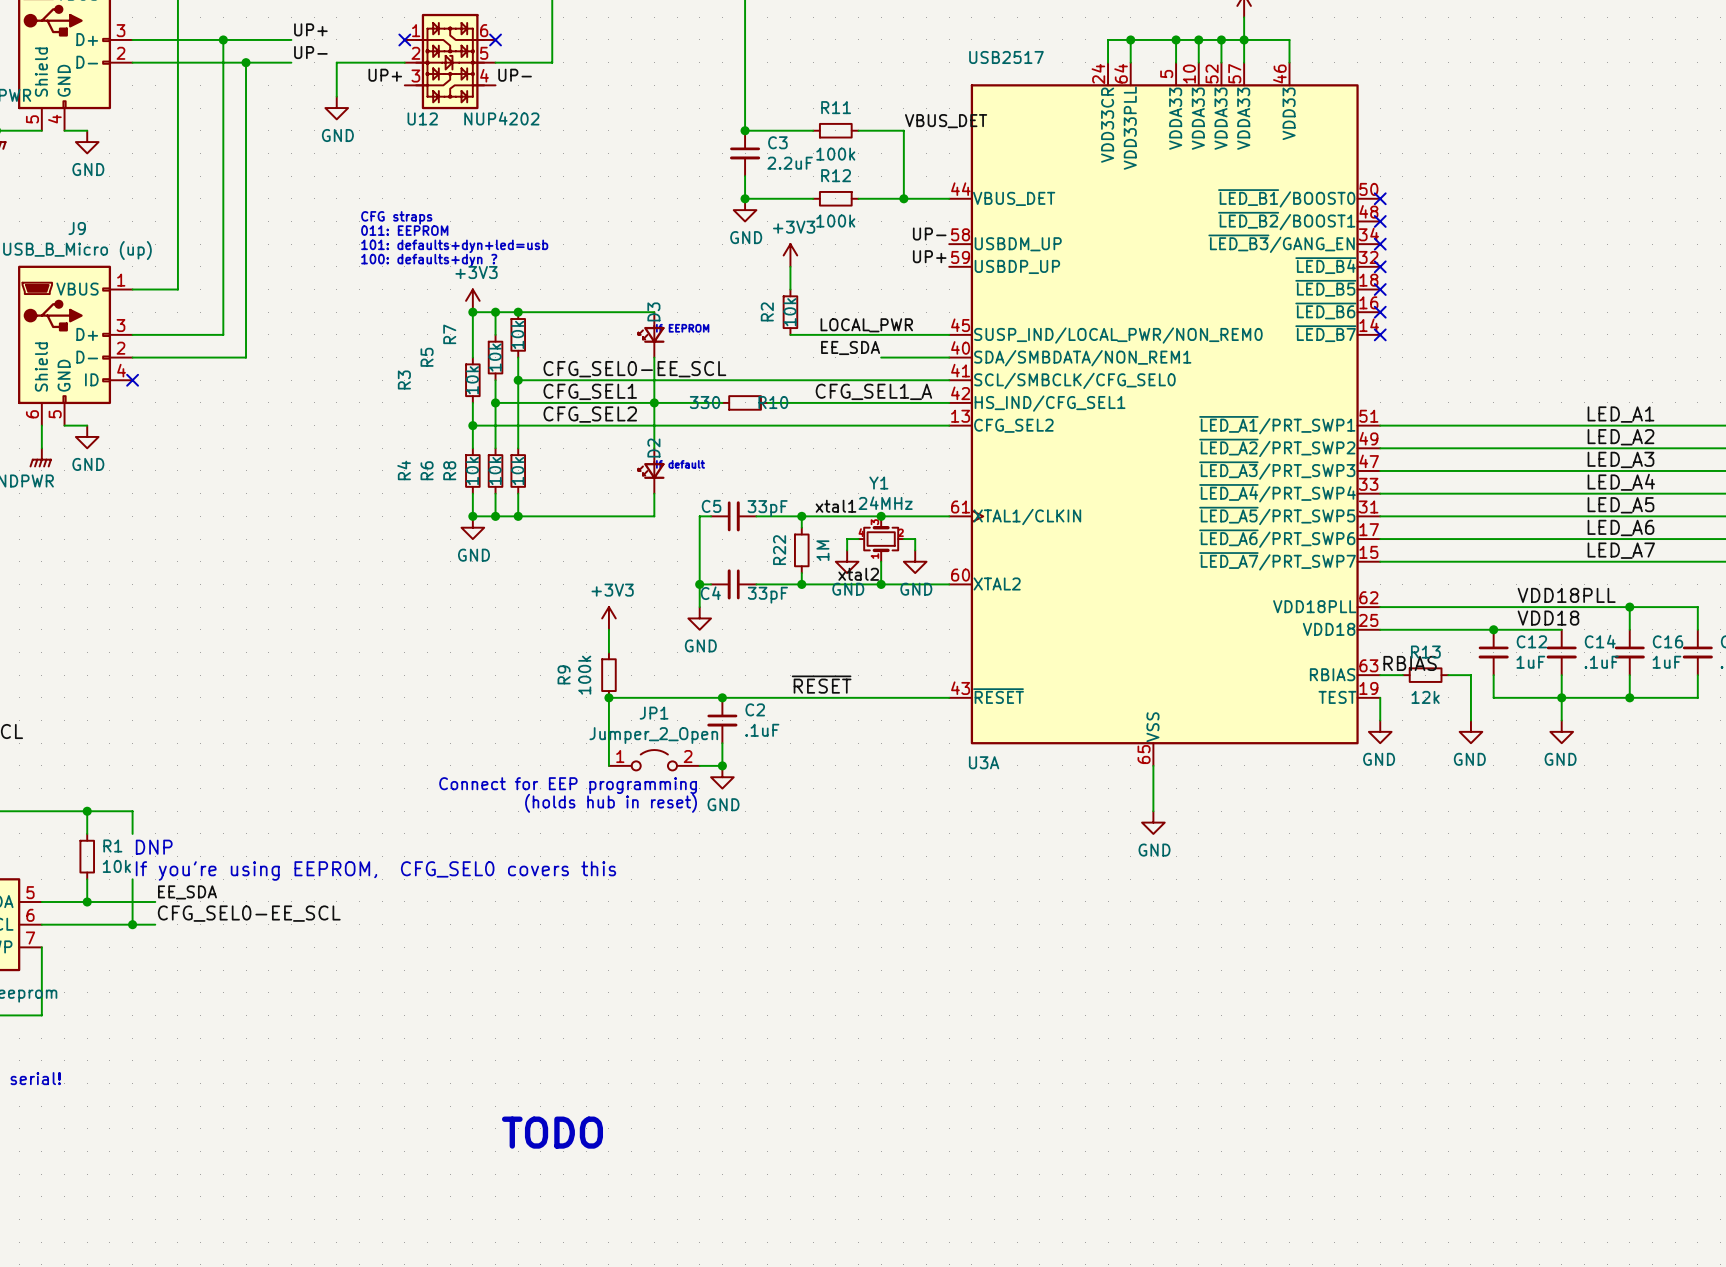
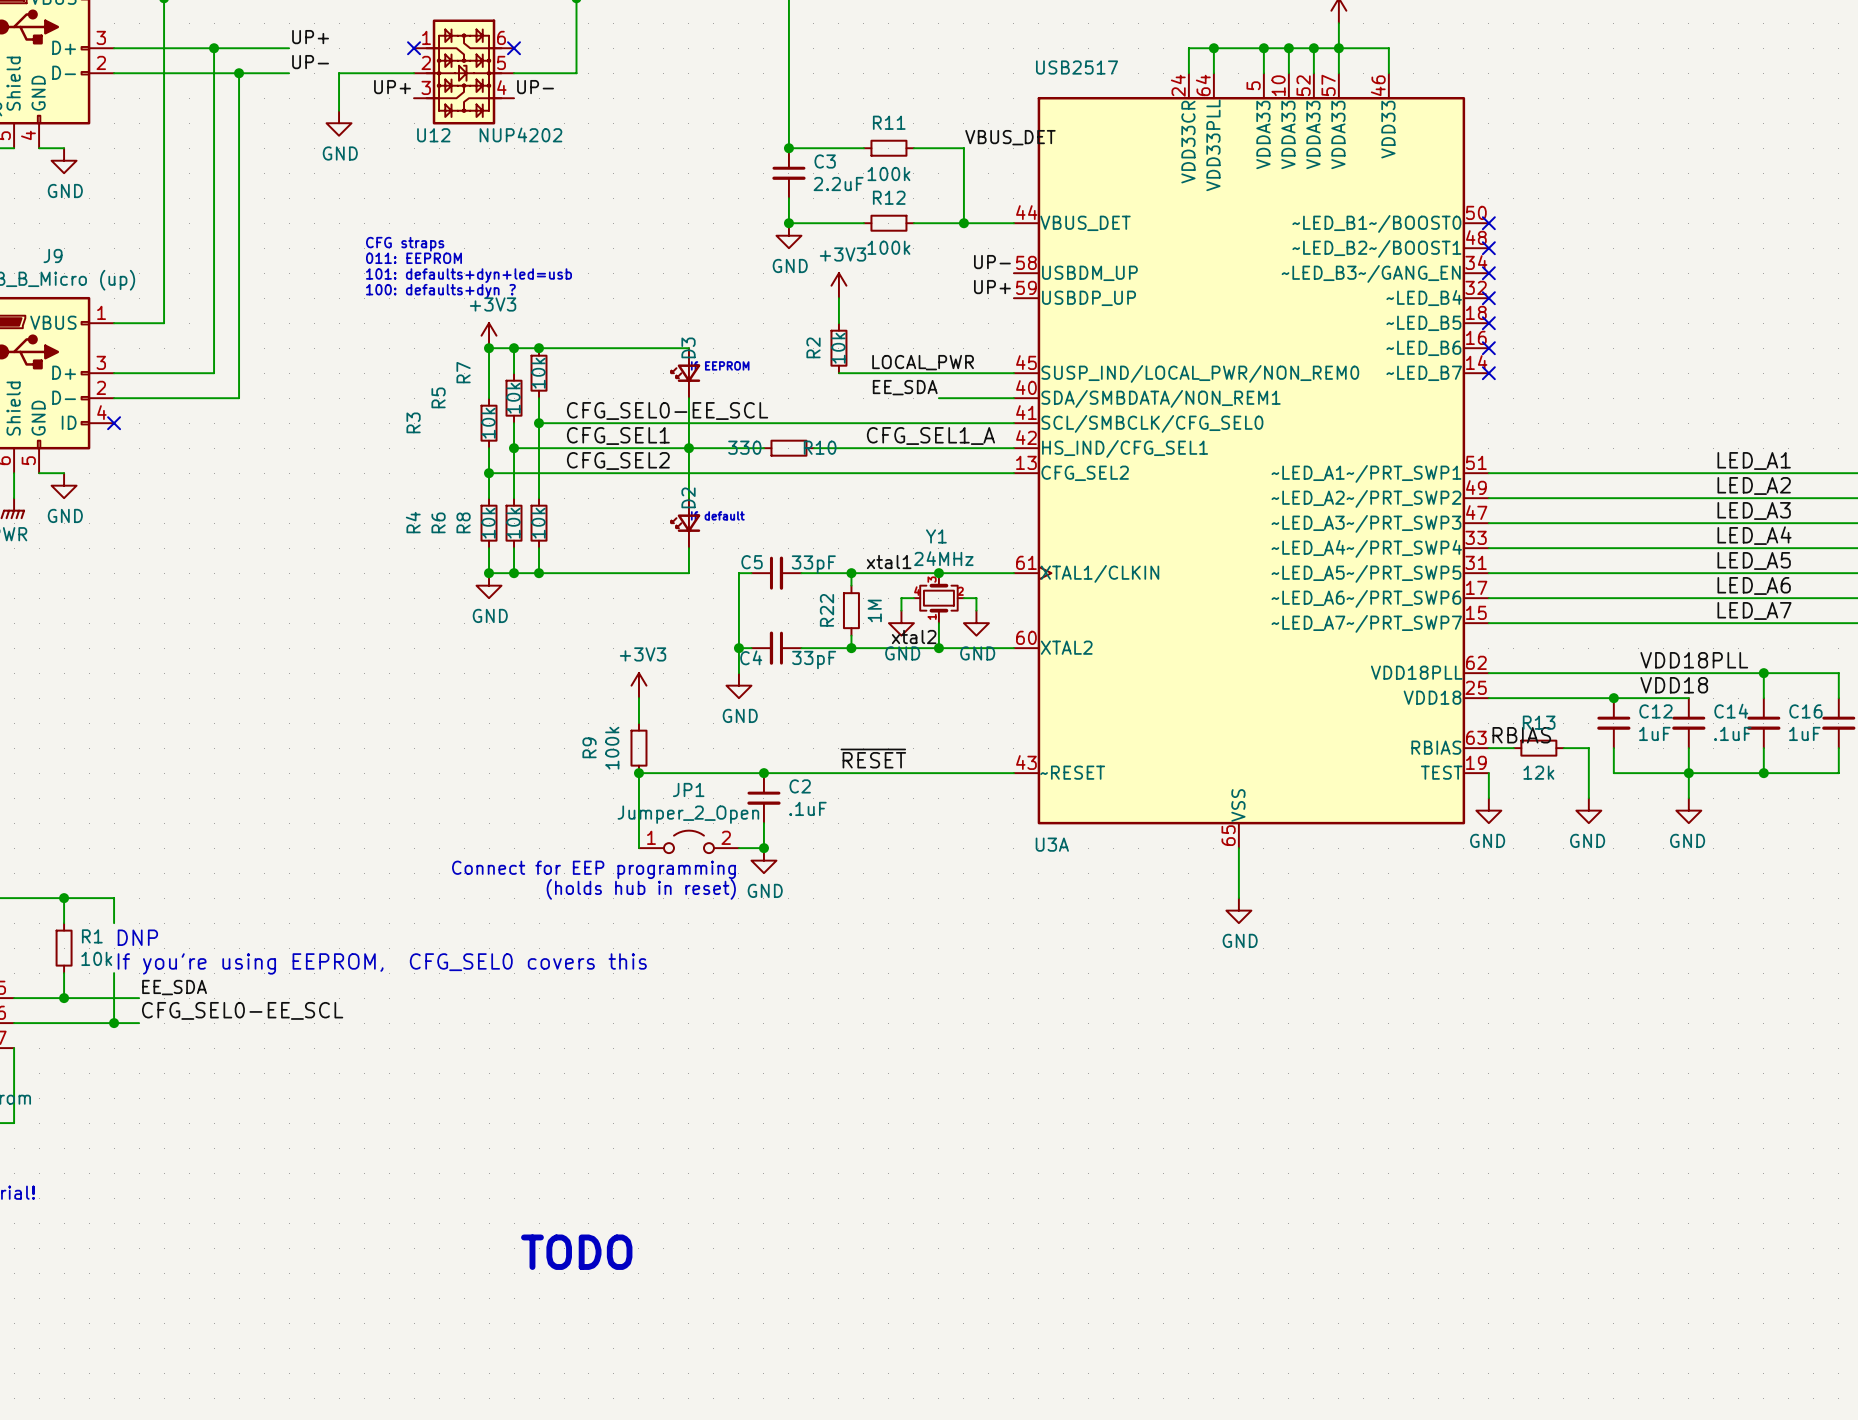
U3A symbol: [949, 62, 1381, 766] -> [1013, 73, 1489, 849]

